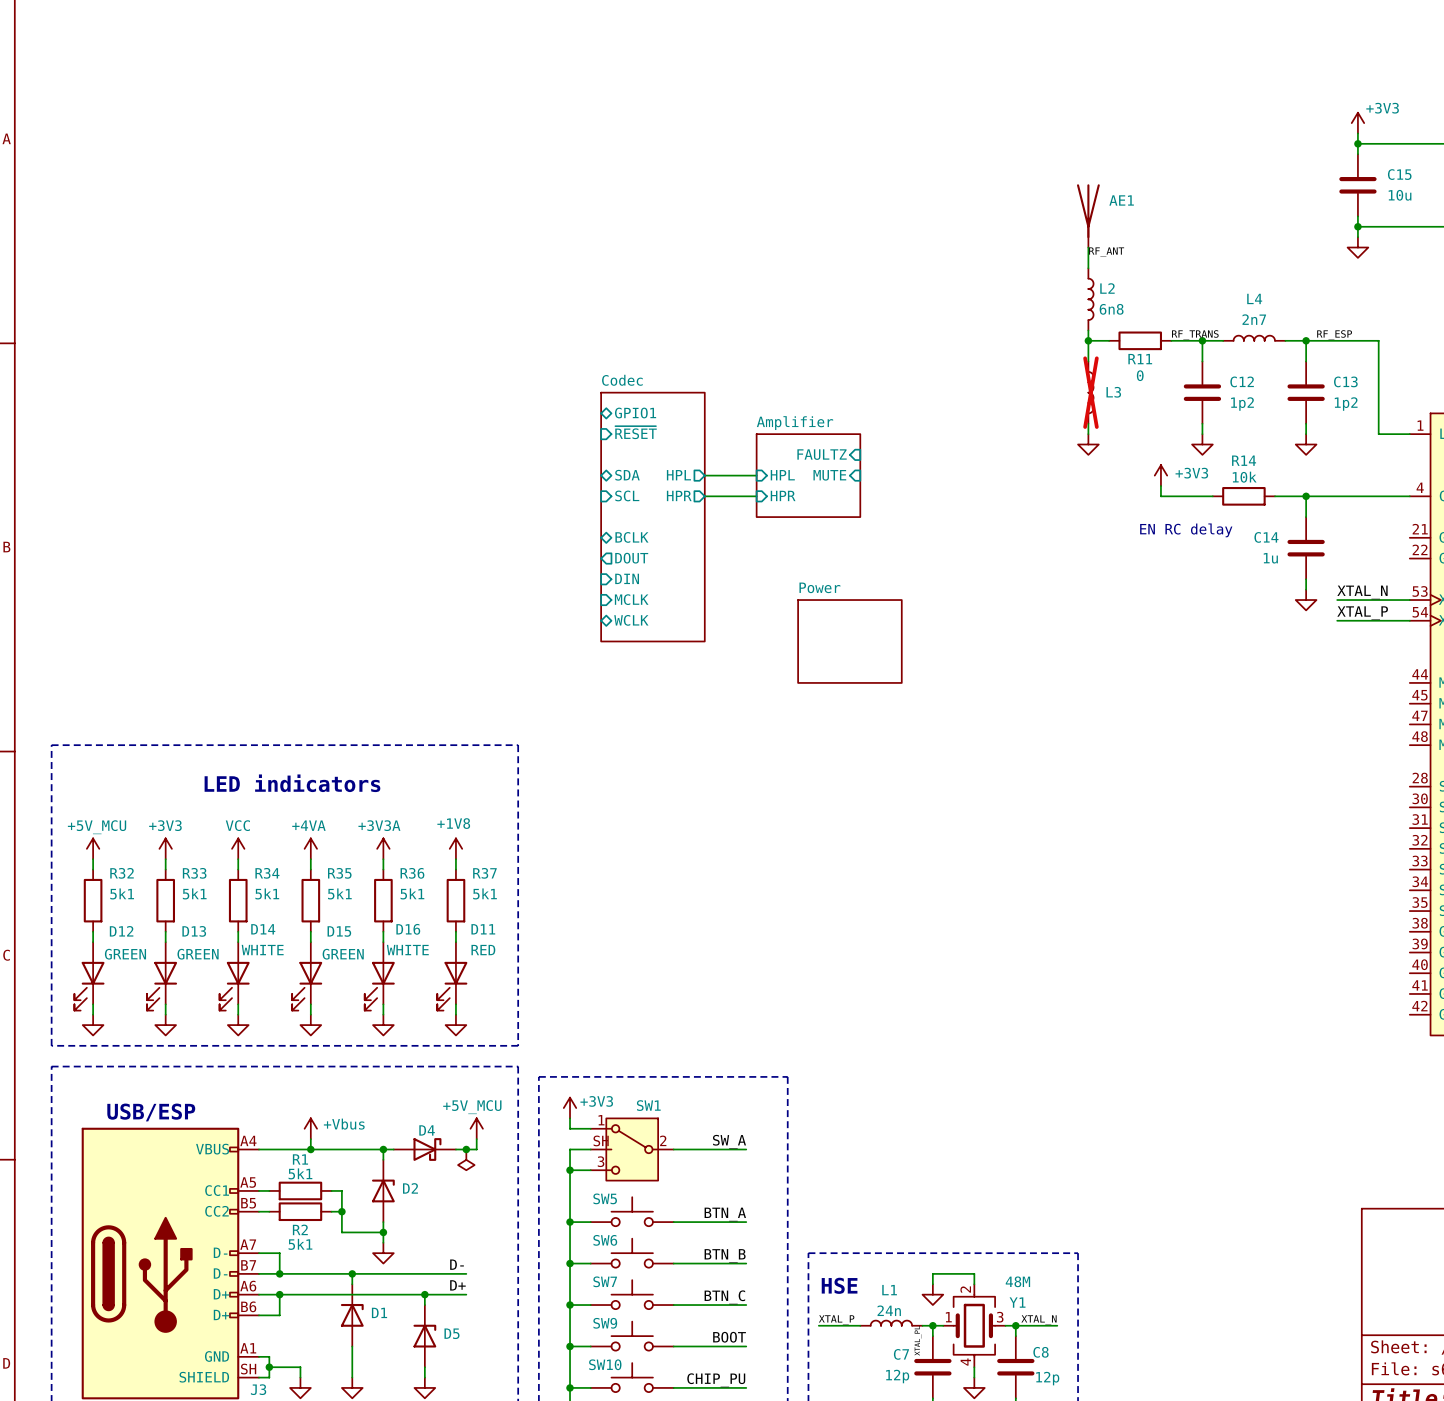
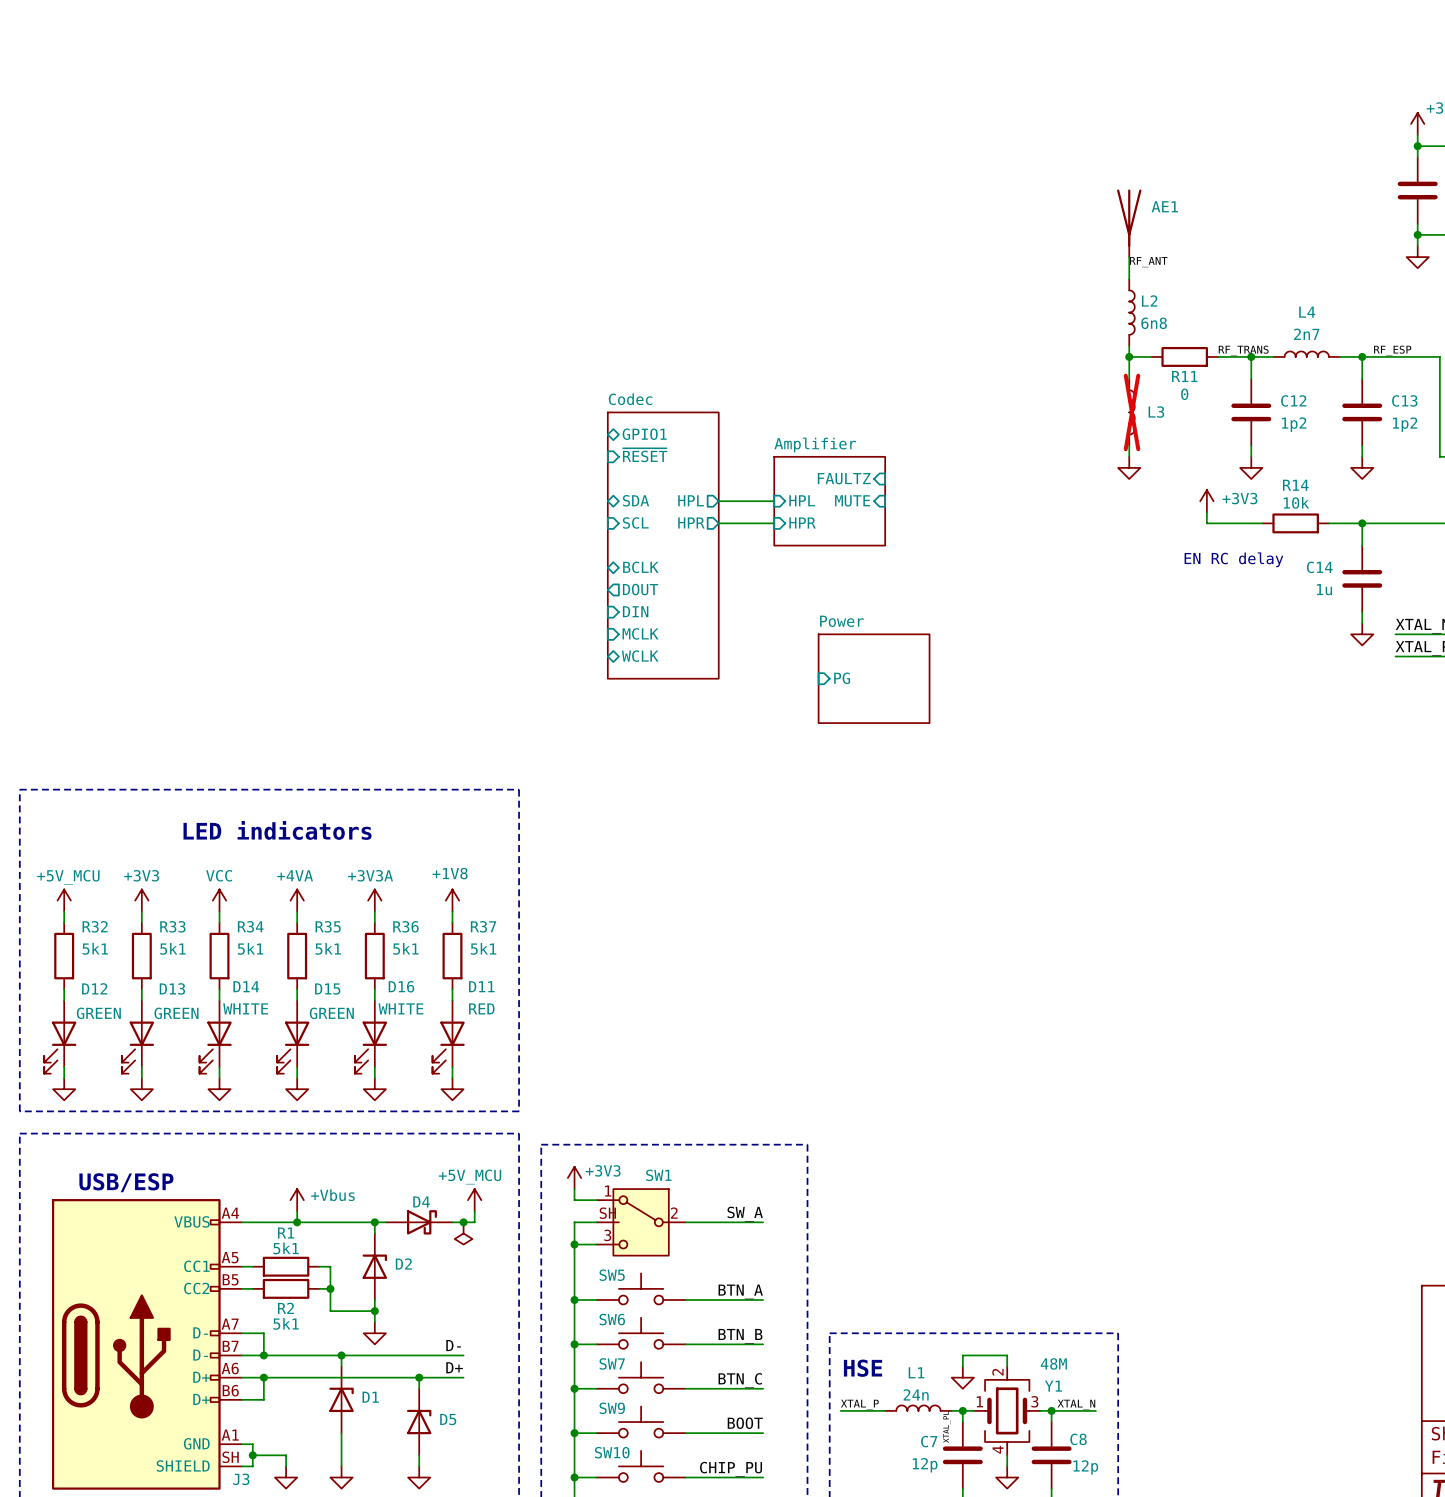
sheet pin: none -> PG (842, 678)

